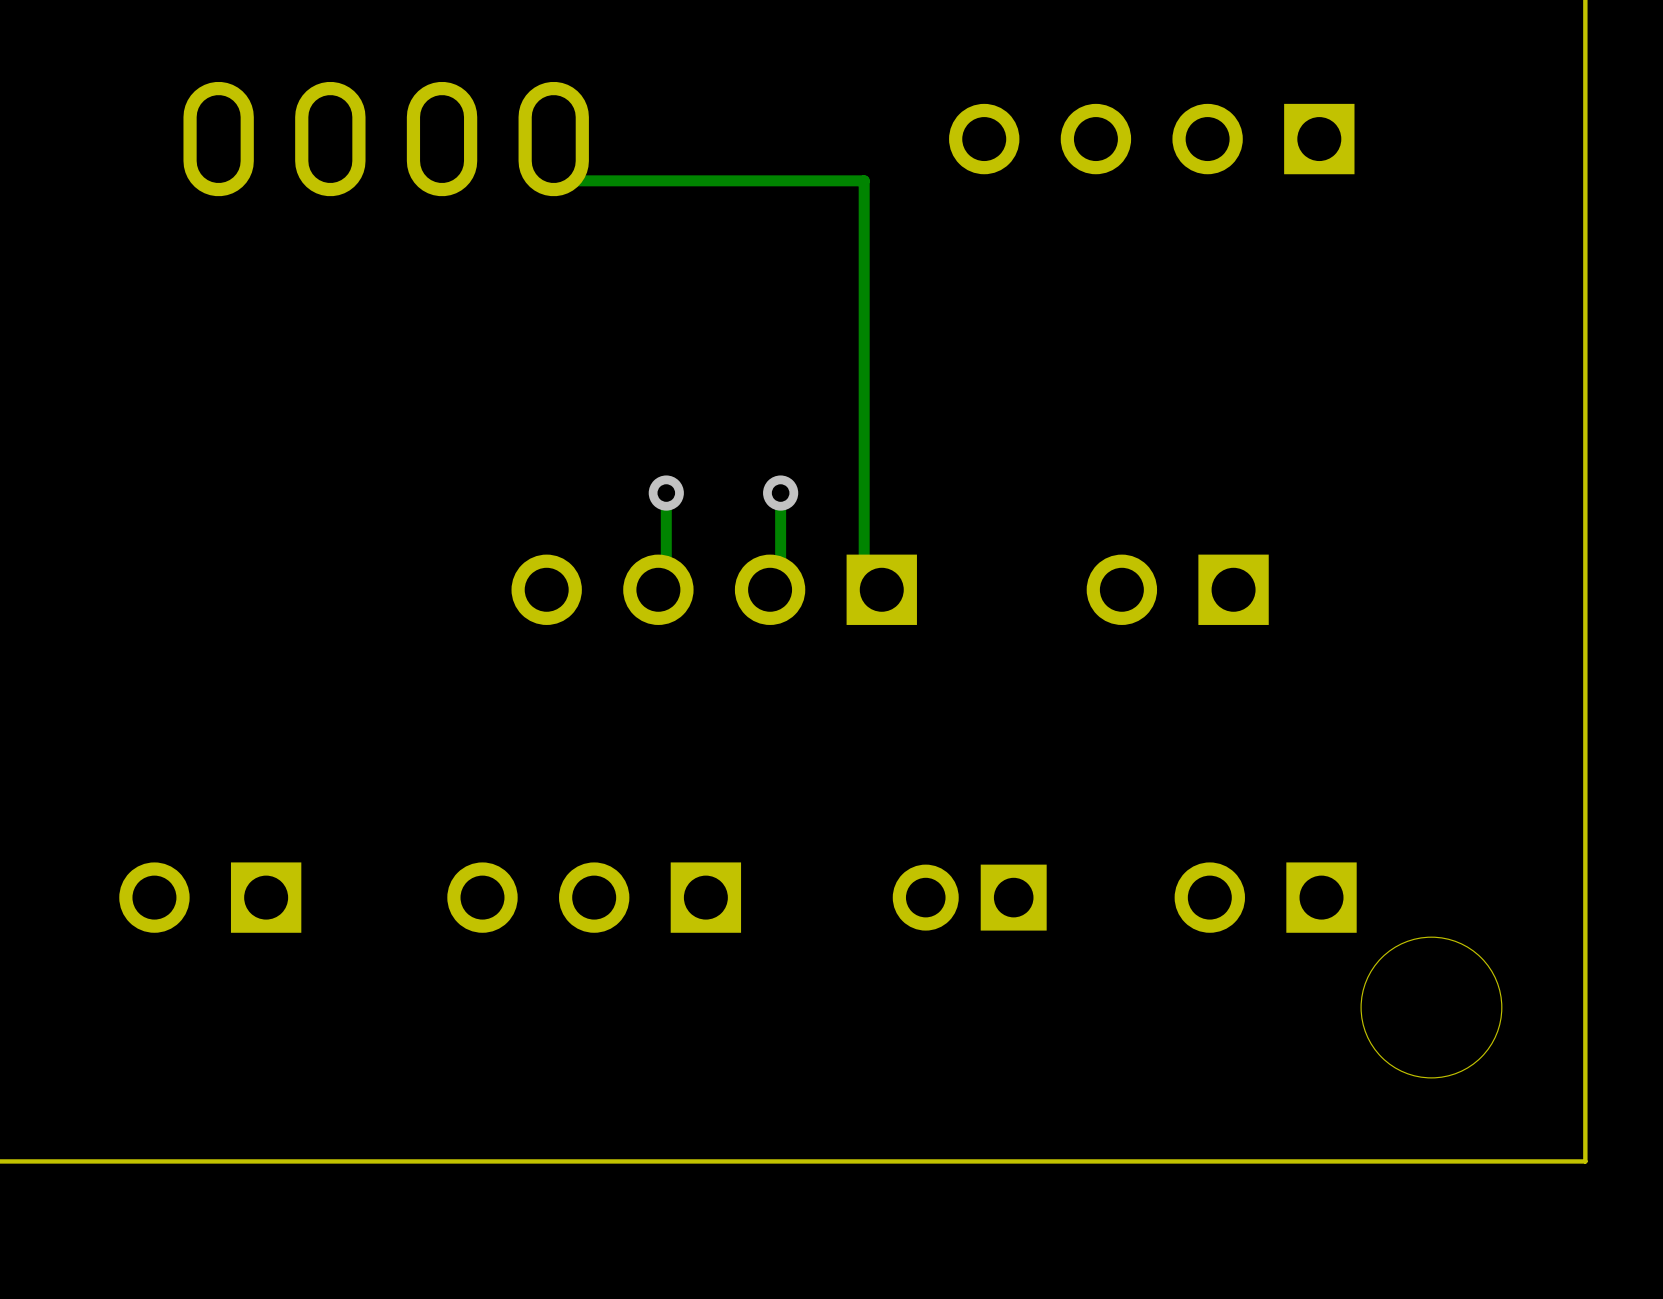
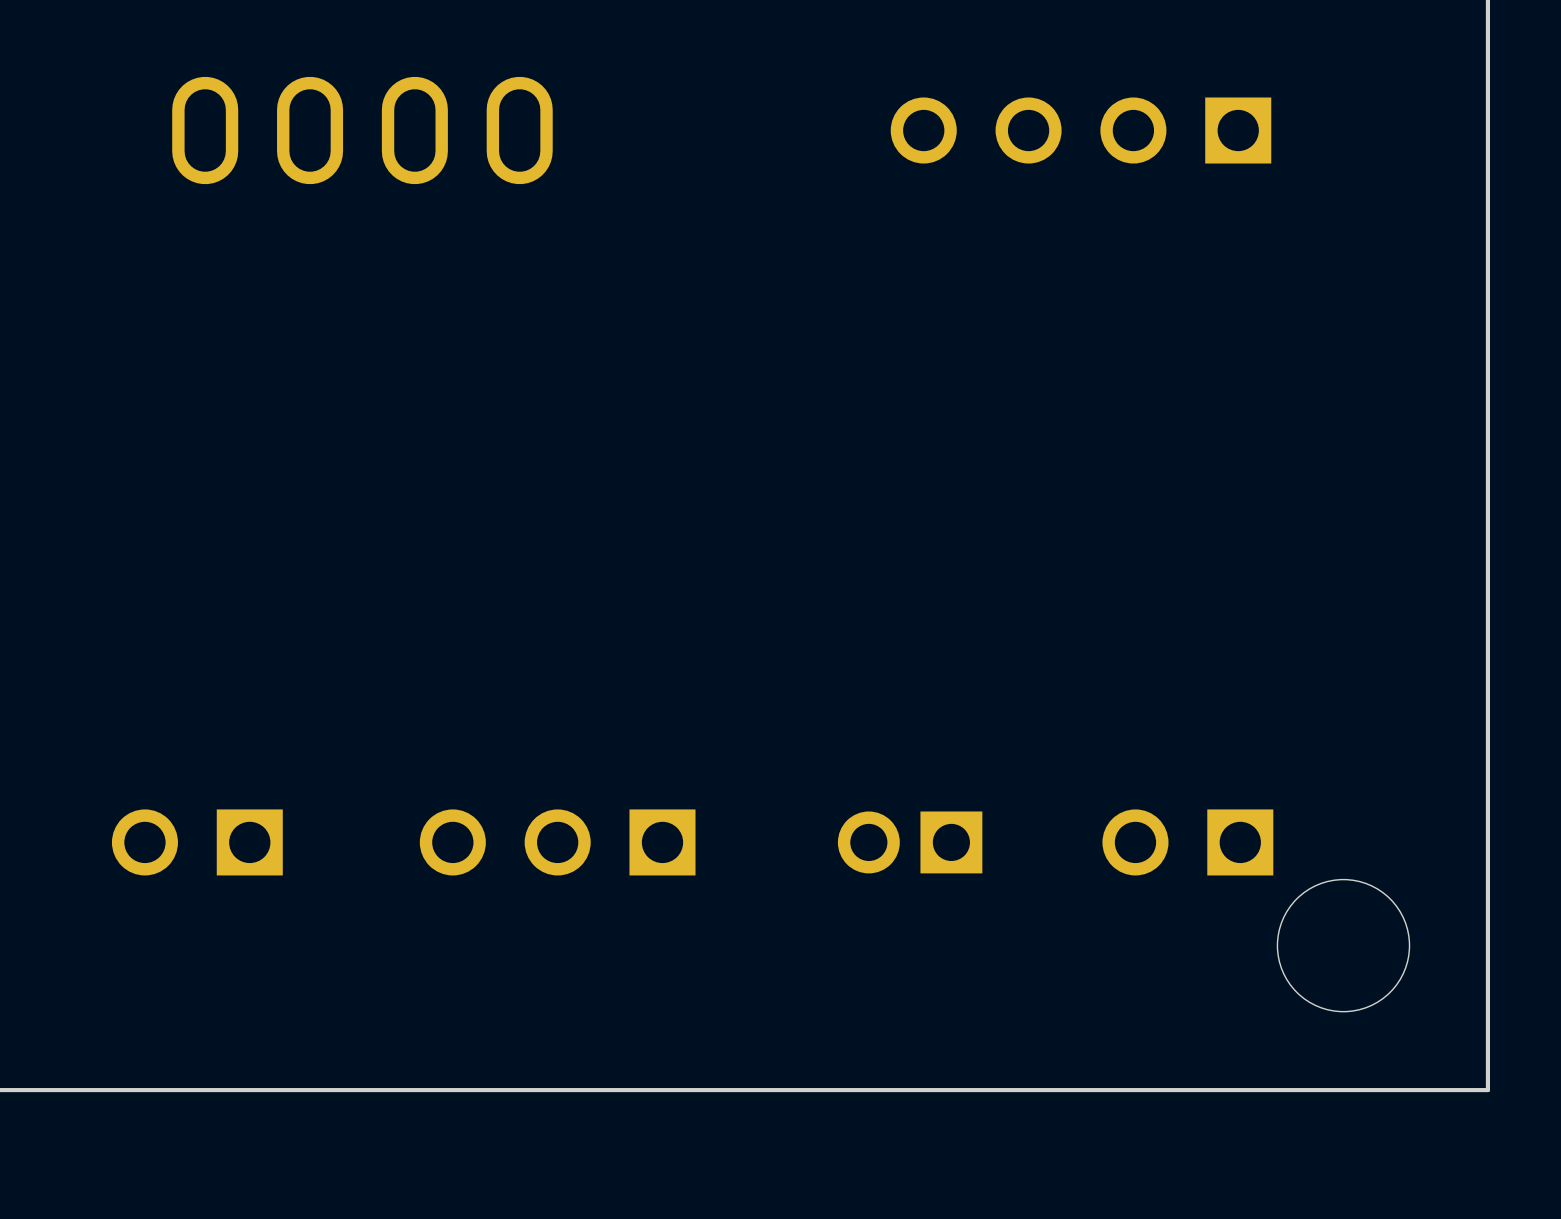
track: (573, 180) (864, 180) (864, 567) -> none
track: (666, 493) (666, 563) -> none
via: (666, 493) -> none
track: (780, 493) (780, 563) -> none
via: (780, 493) -> none
part: (714, 589) -> none
part: (1177, 589) -> none

